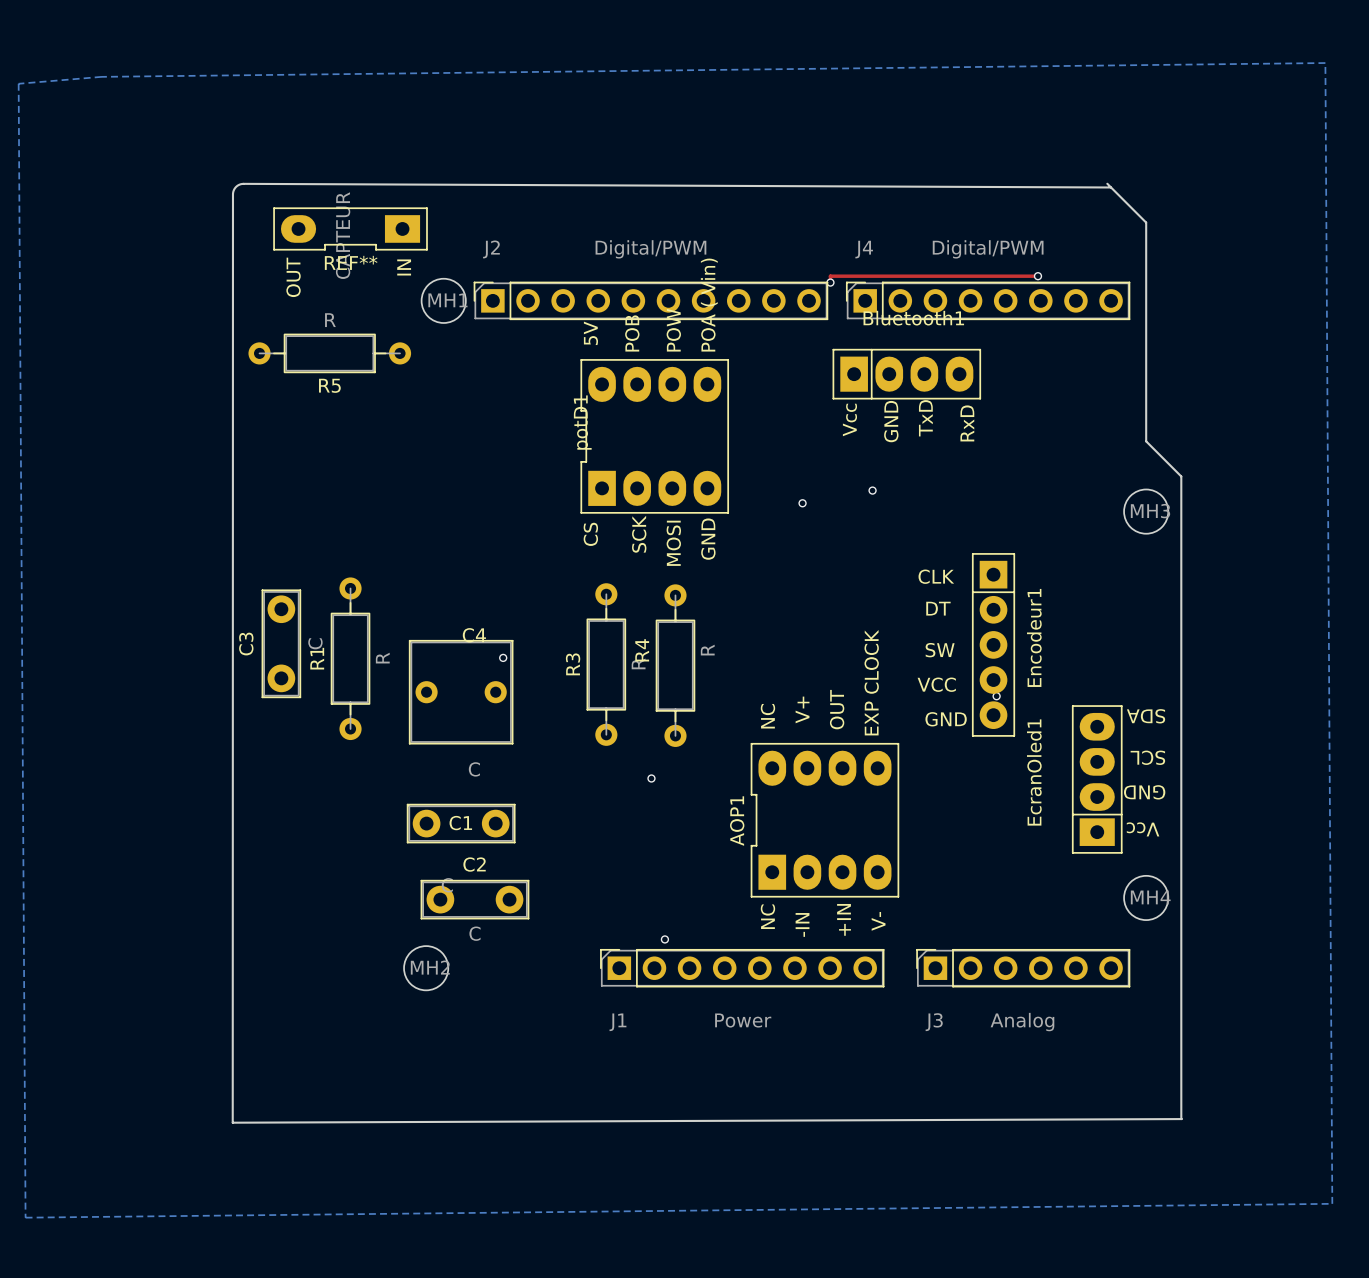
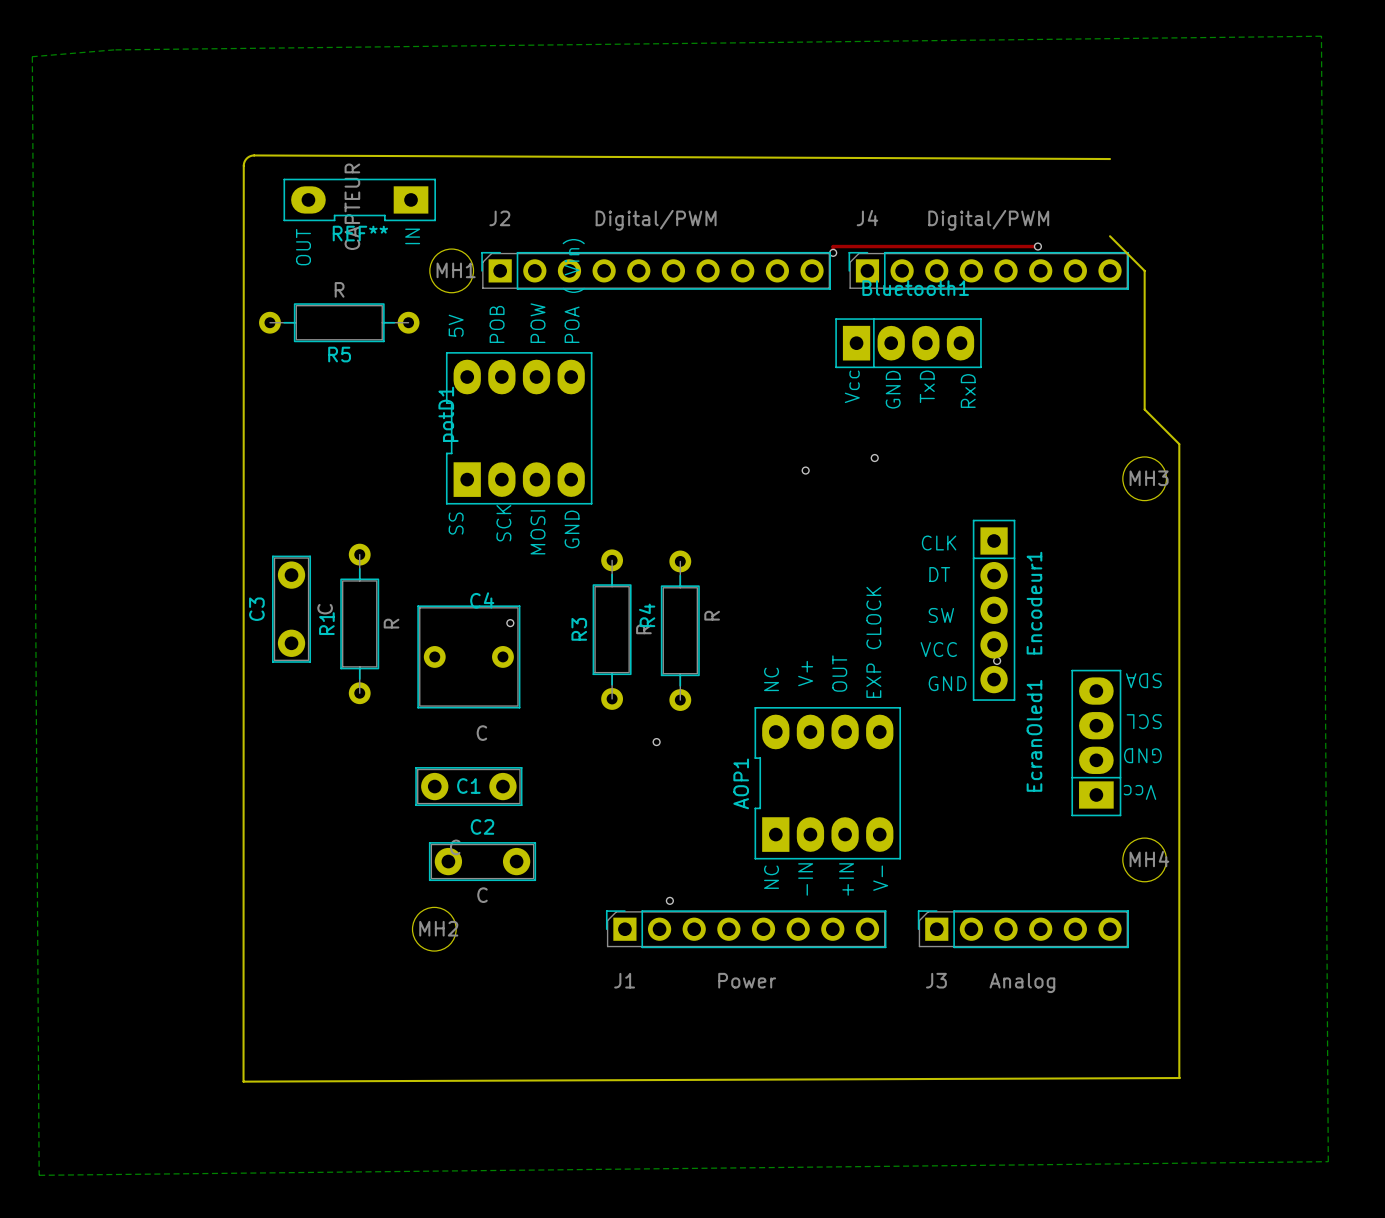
board edge: (1107, 183) (1146, 222) (1146, 300) -> (1110, 236) (1144, 270)
potD1 position: (654, 436) -> (519, 428)
potD1 text: CS (590, 534) -> SS (456, 523)

